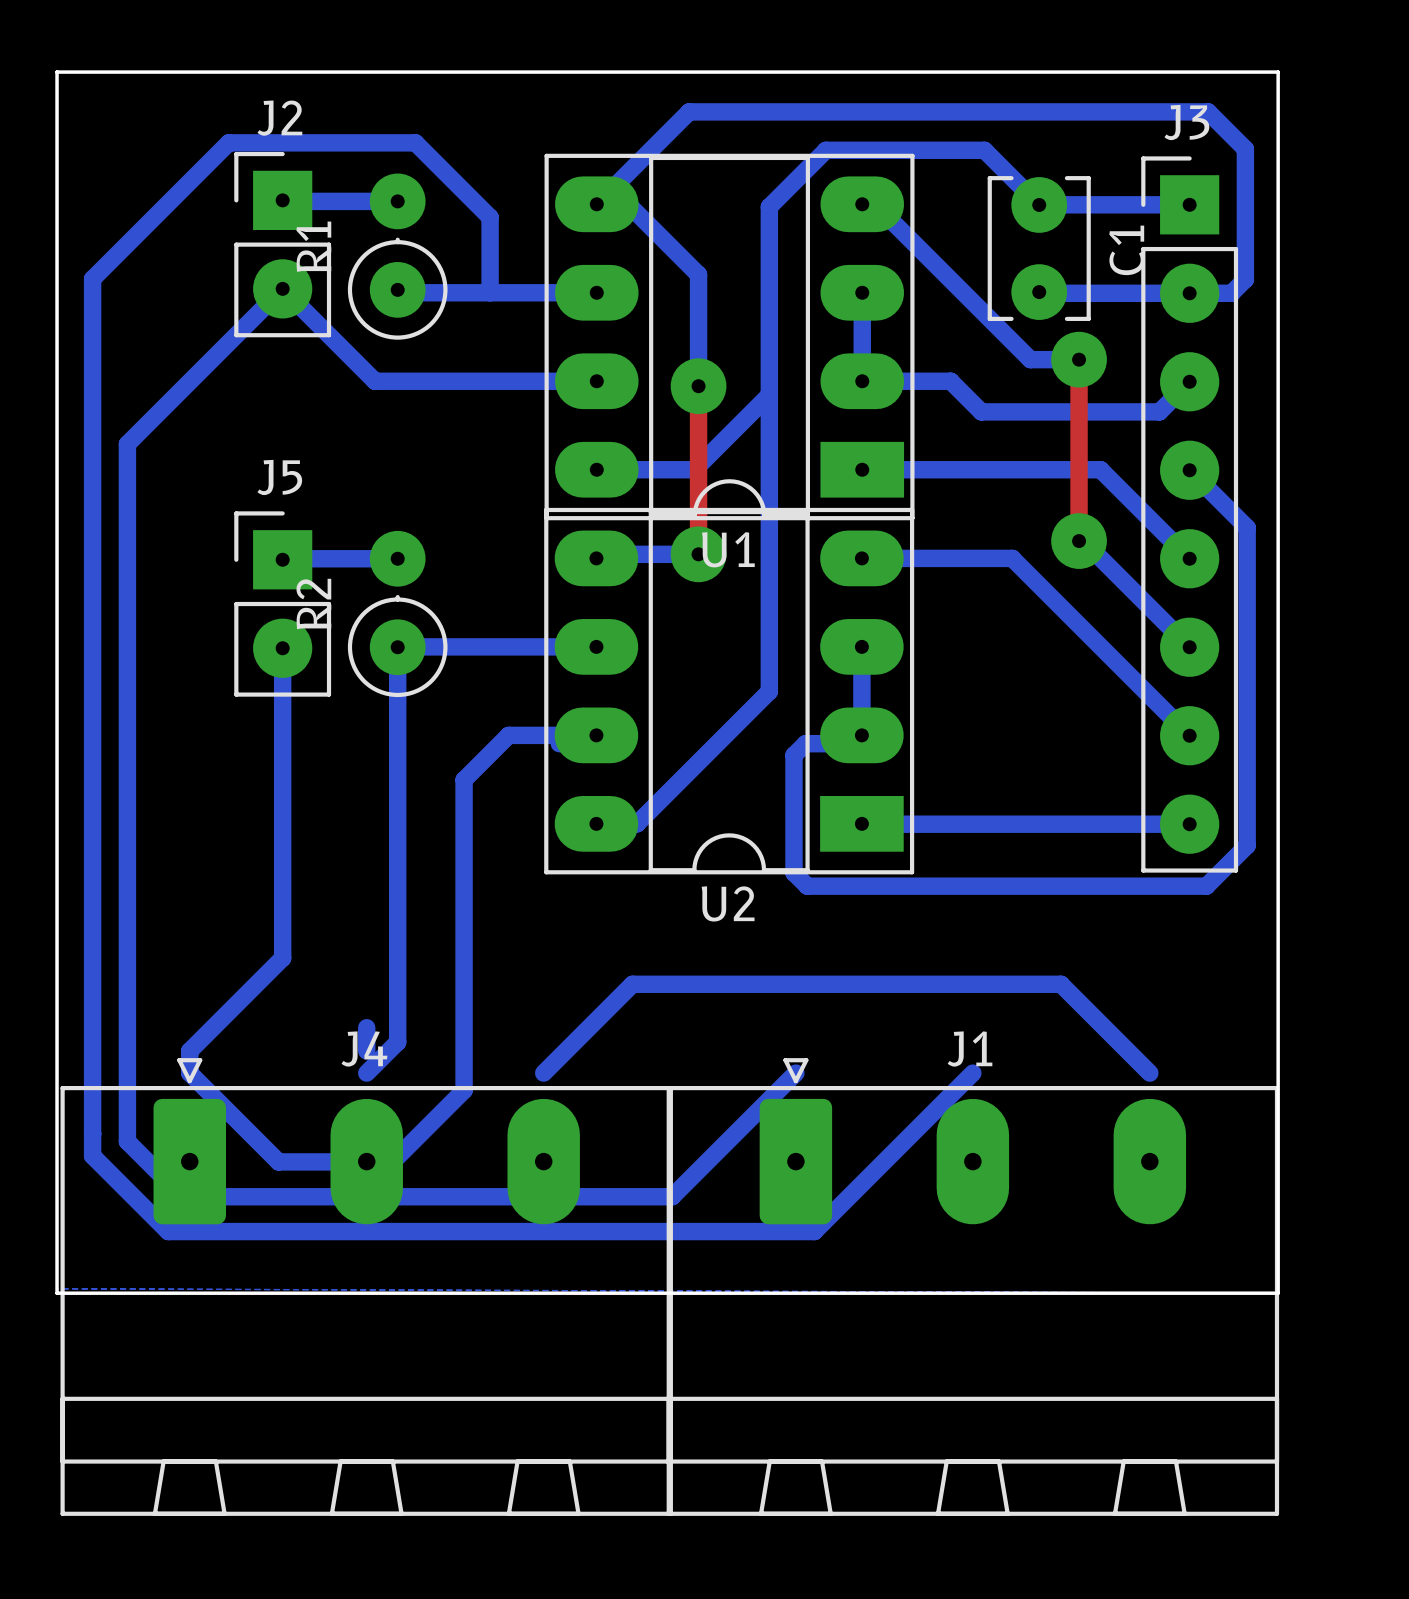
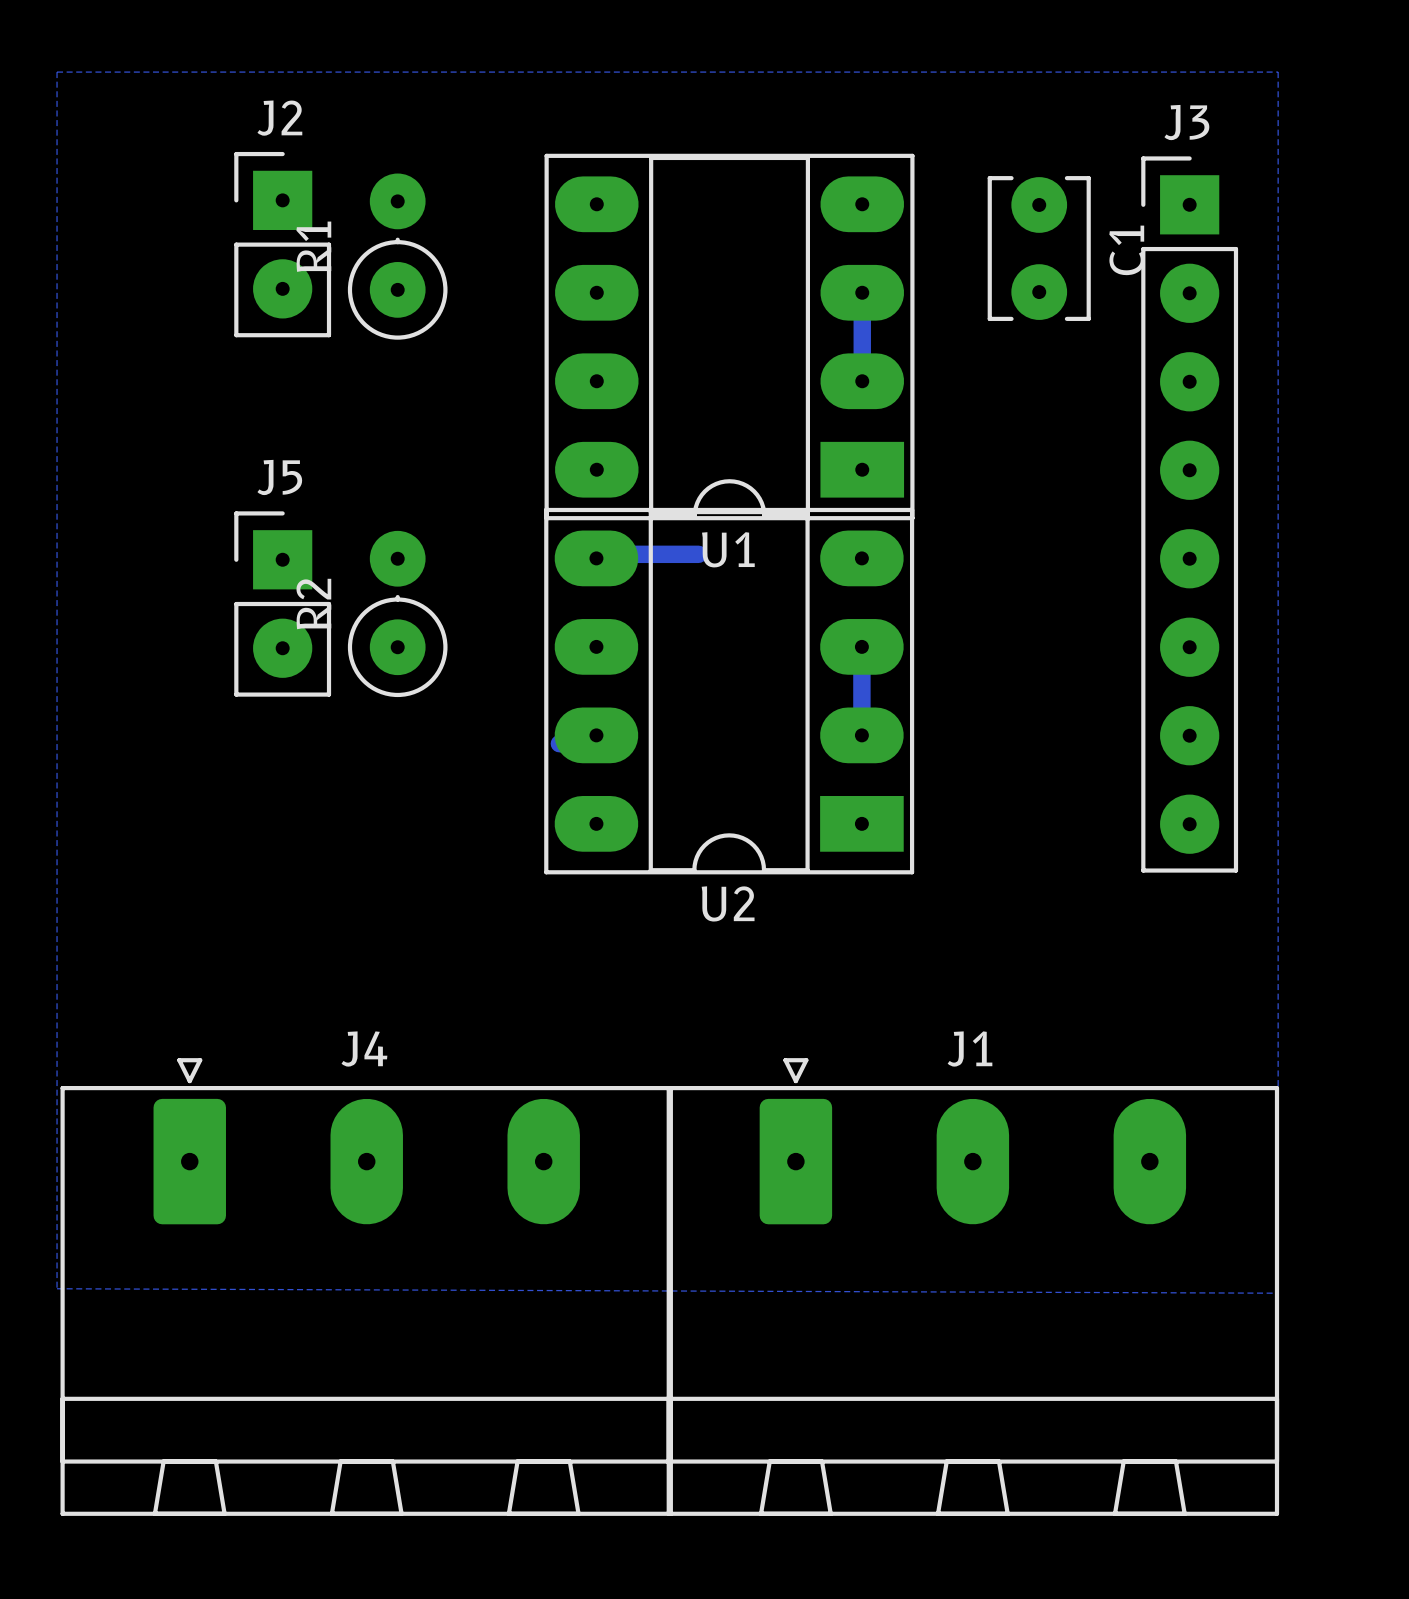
board edge: (57, 72) (1278, 72) (1278, 1293) (57, 1293) (57, 72) -> none
bottom track: (282, 200) (397, 201) -> none
bottom track: (862, 204) (875, 204) (1030, 359) (1079, 359) -> none
bottom track: (1039, 204) (984, 150) (825, 150) (769, 206) (769, 691) (636, 823) (596, 823) -> none
bottom track: (1039, 204) (1189, 204) -> none
bottom track: (397, 289) (400, 292) (596, 292) -> none
bottom track: (490, 292) (490, 217) (415, 142) (228, 142) (92, 279) (92, 1155) (168, 1231) (814, 1231) (972, 1073) -> none
bottom track: (1039, 292) (1231, 293) (1245, 279) (1245, 149) (1208, 111) (689, 111) (596, 204) (628, 204) (698, 274) (698, 386) -> none
top track: (1079, 359) (1079, 541) -> none
via: (1079, 359) -> none
bottom track: (596, 381) (375, 381) (282, 288) (127, 444) (127, 1141) (182, 1196) (672, 1196) (795, 1073) -> none
bottom track: (862, 381) (950, 381) (981, 411) (1159, 411) (1189, 381) -> none
top track: (698, 386) (698, 558) -> none
via: (698, 386) -> none
bottom track: (769, 395) (694, 469) (596, 469) -> none
bottom track: (862, 469) (1100, 469) (1189, 558) -> none
bottom track: (1189, 470) (1247, 527) (1247, 845) (1206, 886) (807, 886) (793, 872) (793, 755) (805, 743) (861, 743) -> none
bottom track: (1079, 541) (1083, 541) (1189, 647) -> none
via: (1079, 541) -> none
via: (698, 554) -> none
bottom track: (397, 558) (282, 559) -> none
bottom track: (861, 558) (1012, 558) (1189, 735) -> none
bottom track: (406, 646) (596, 646) -> none
bottom track: (397, 656) (397, 1042) (366, 1073) -> none
bottom track: (282, 657) (282, 958) (189, 1050) (189, 1073) (278, 1161) (392, 1161) (464, 1090) (464, 779) (508, 735) (596, 735) -> none
bottom track: (862, 824) (1189, 824) -> none
bottom track: (366, 1027) (366, 1050) -> none
bottom track: (543, 1073) (632, 984) (1061, 984) (1149, 1073) -> none

